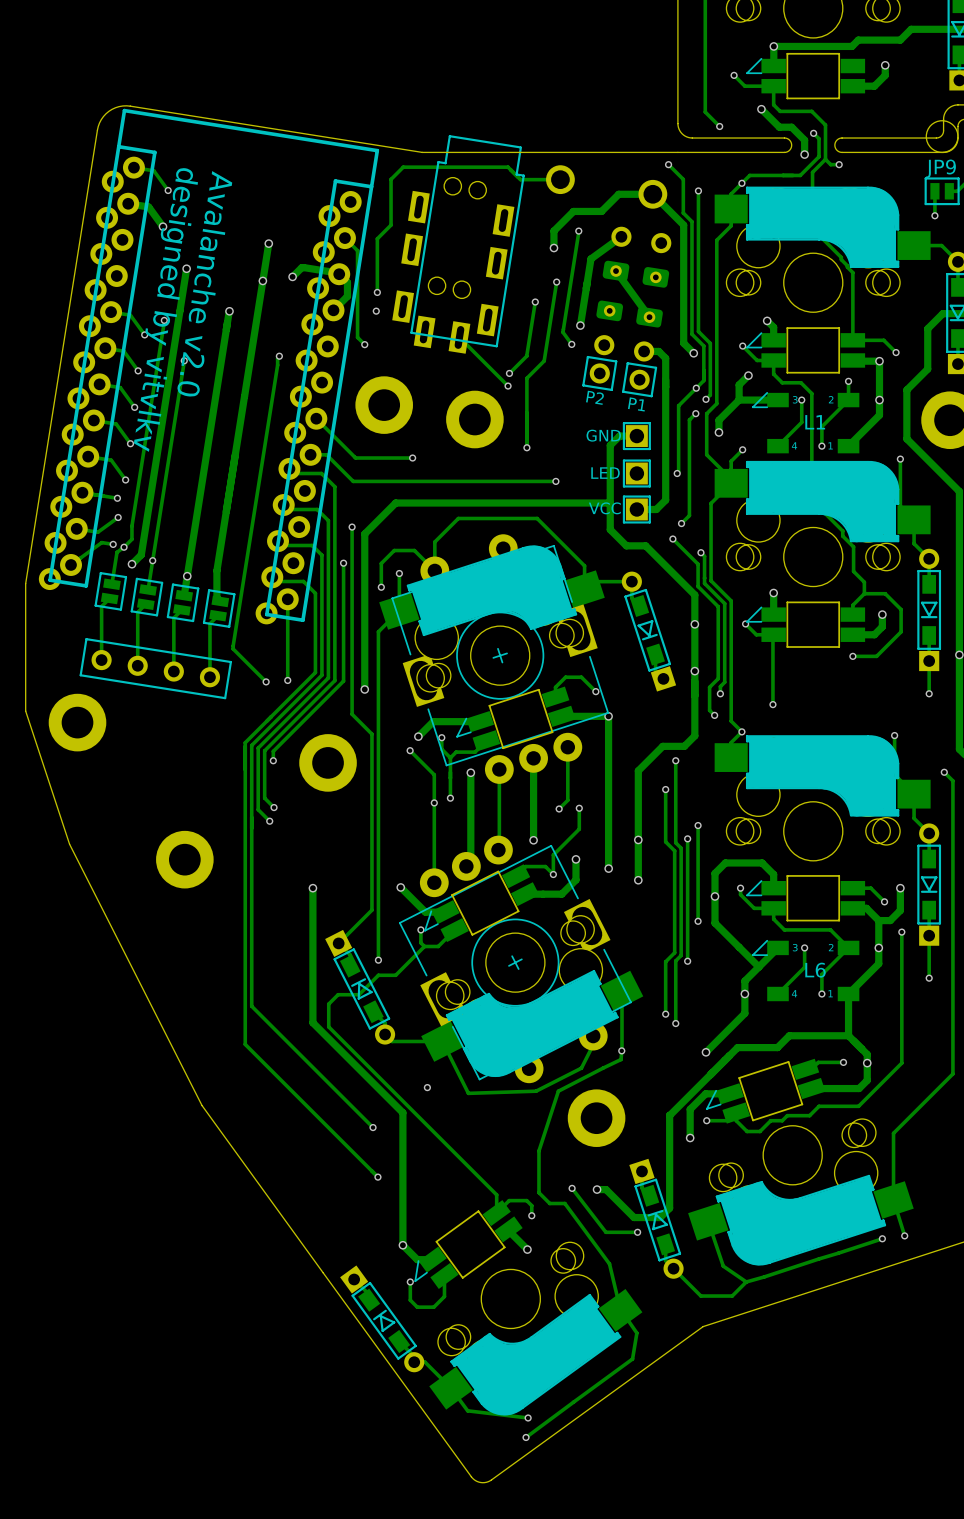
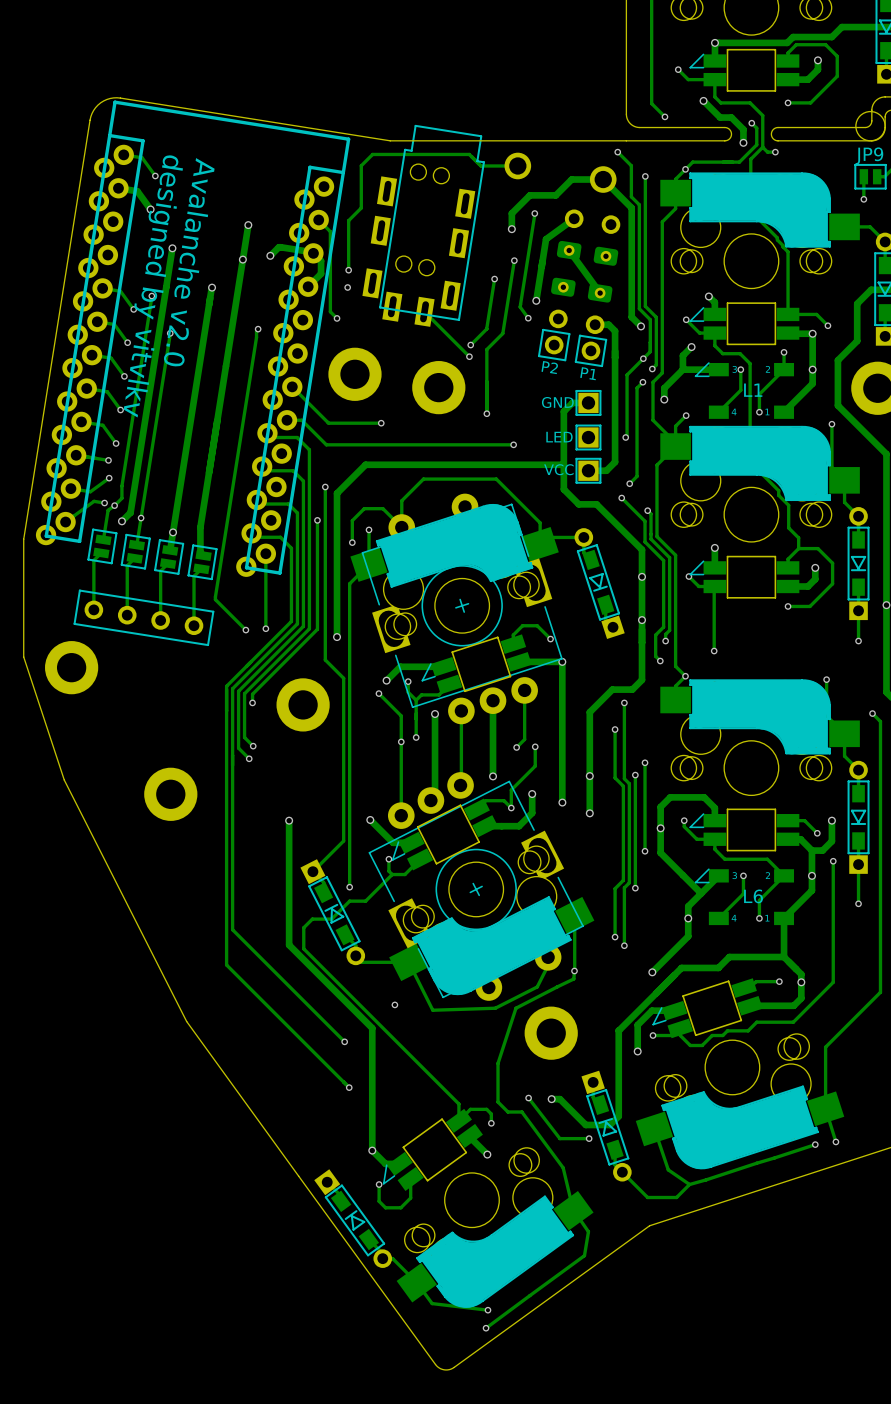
track: none -> (788, 61) (788, 53) (796, 44) (825, 44) (837, 56) (837, 76) (810, 102) (788, 102)
via: none -> (788, 102)

